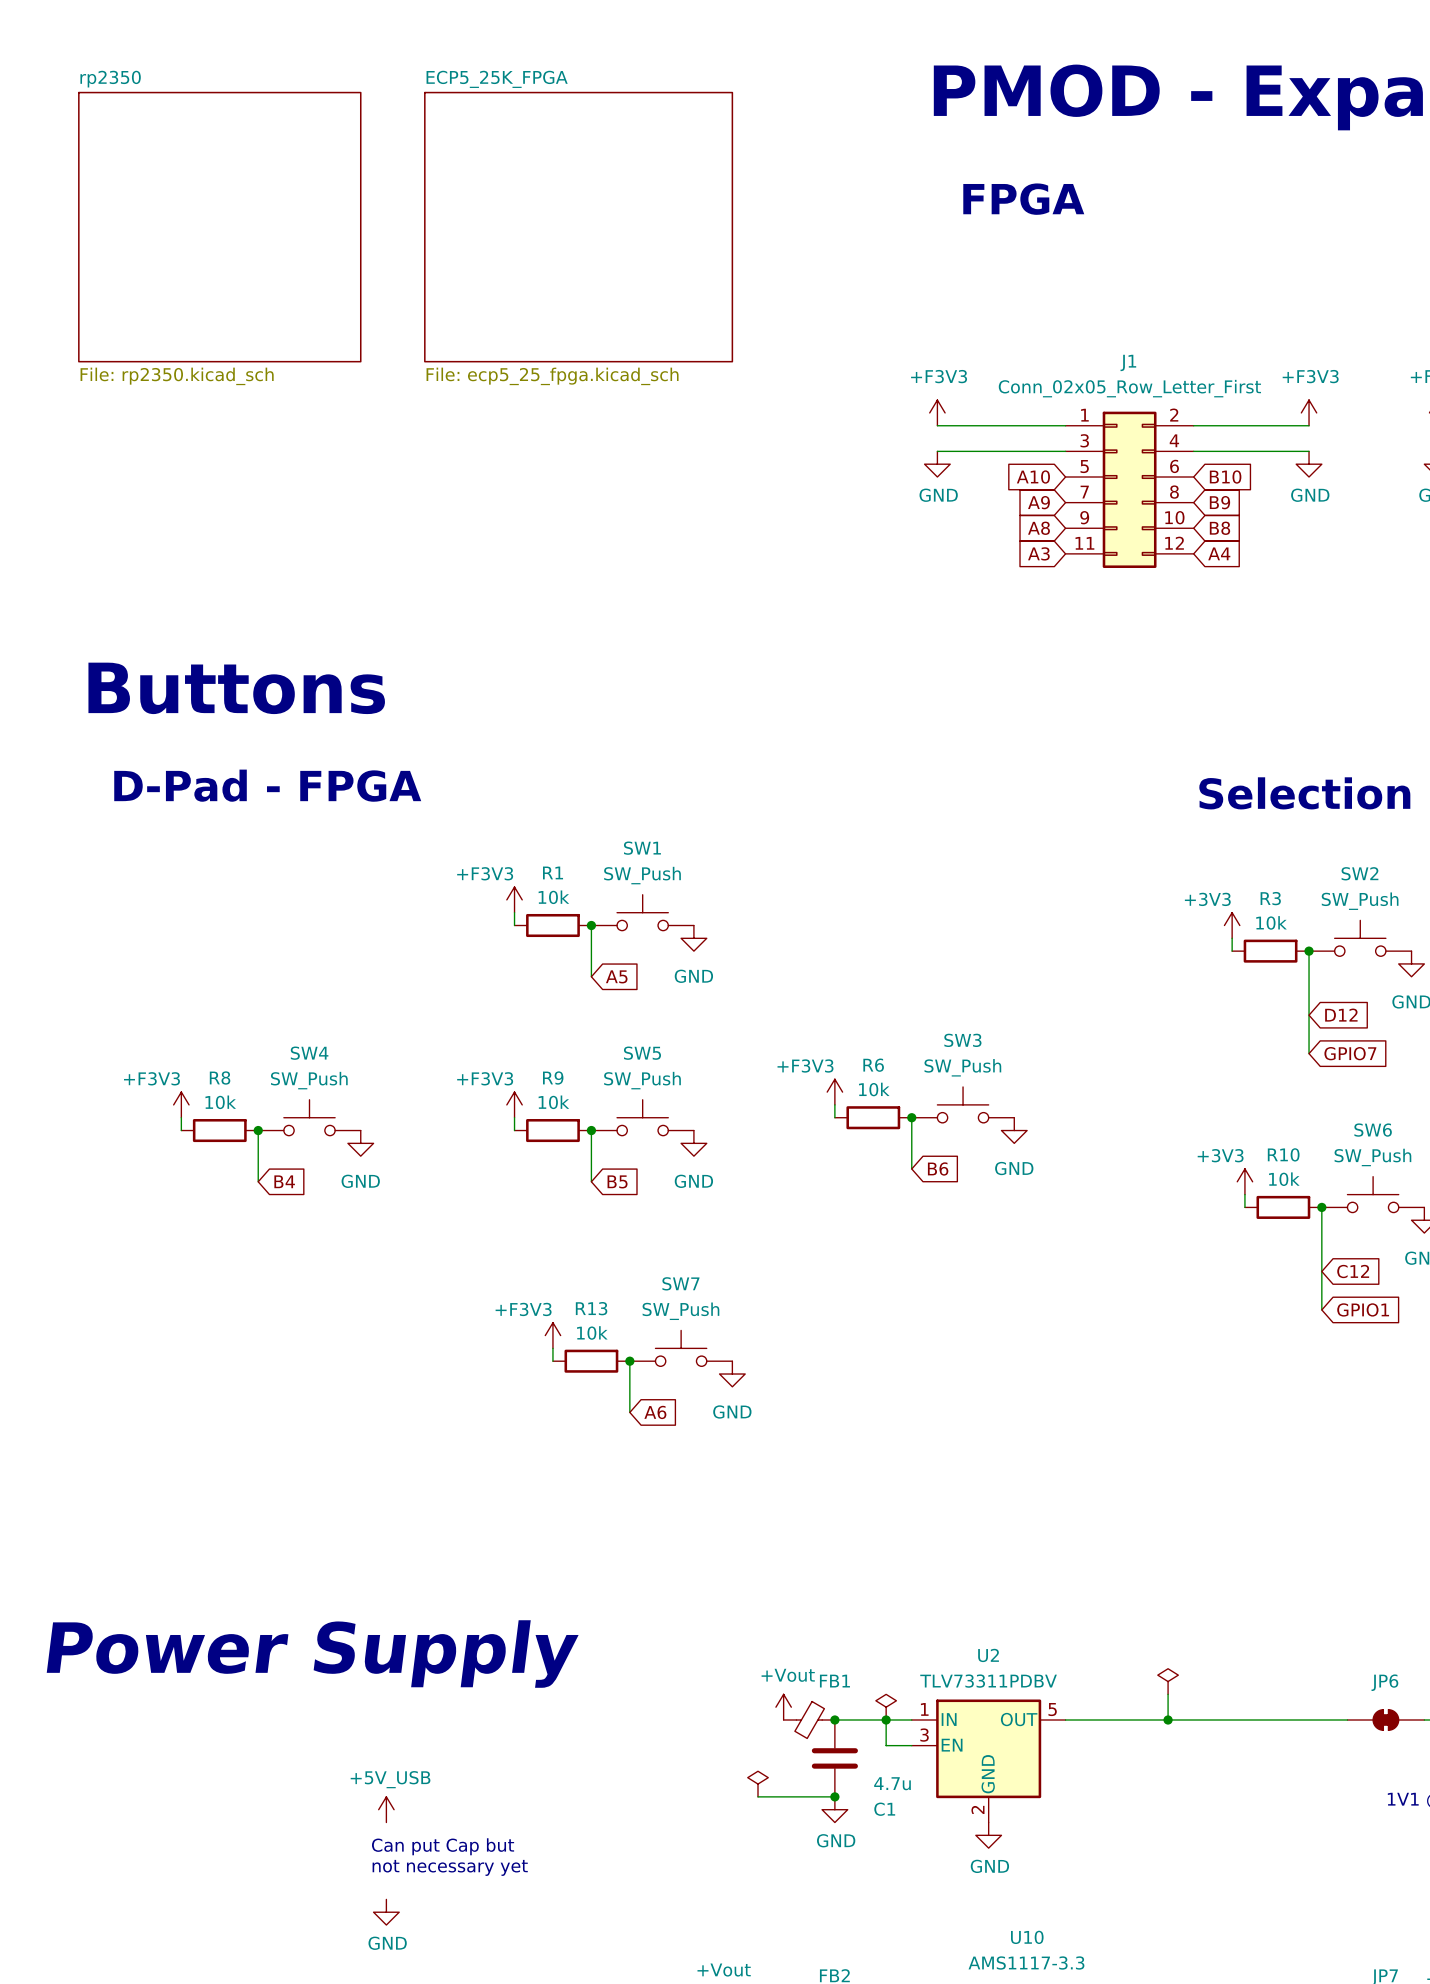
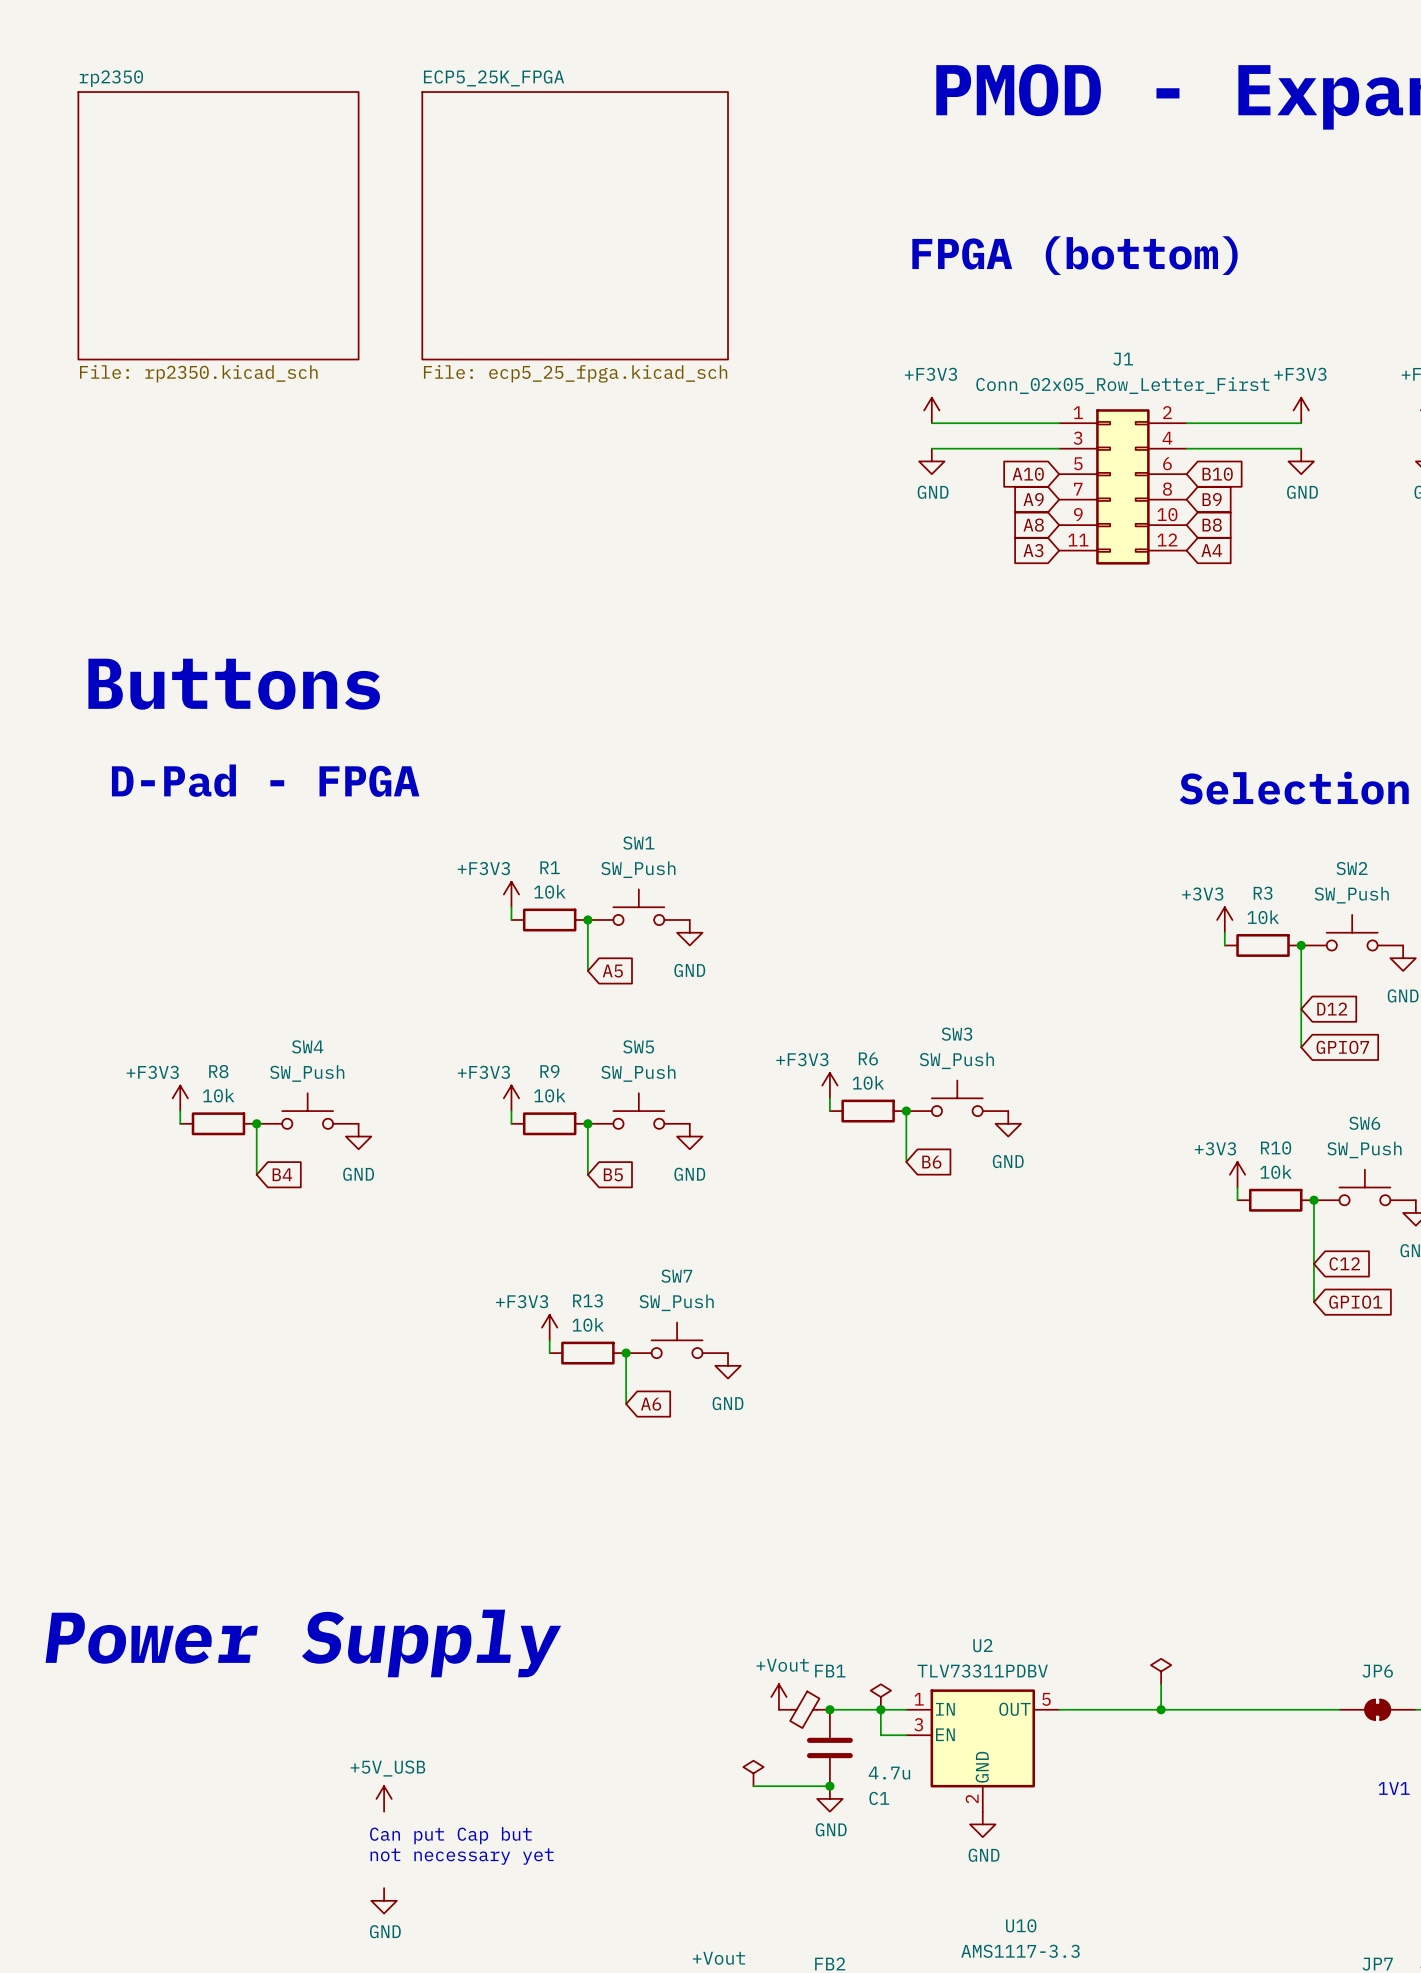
text: FPGA (1023, 199) -> none
text: none -> FPGA (bottom) (1075, 255)

